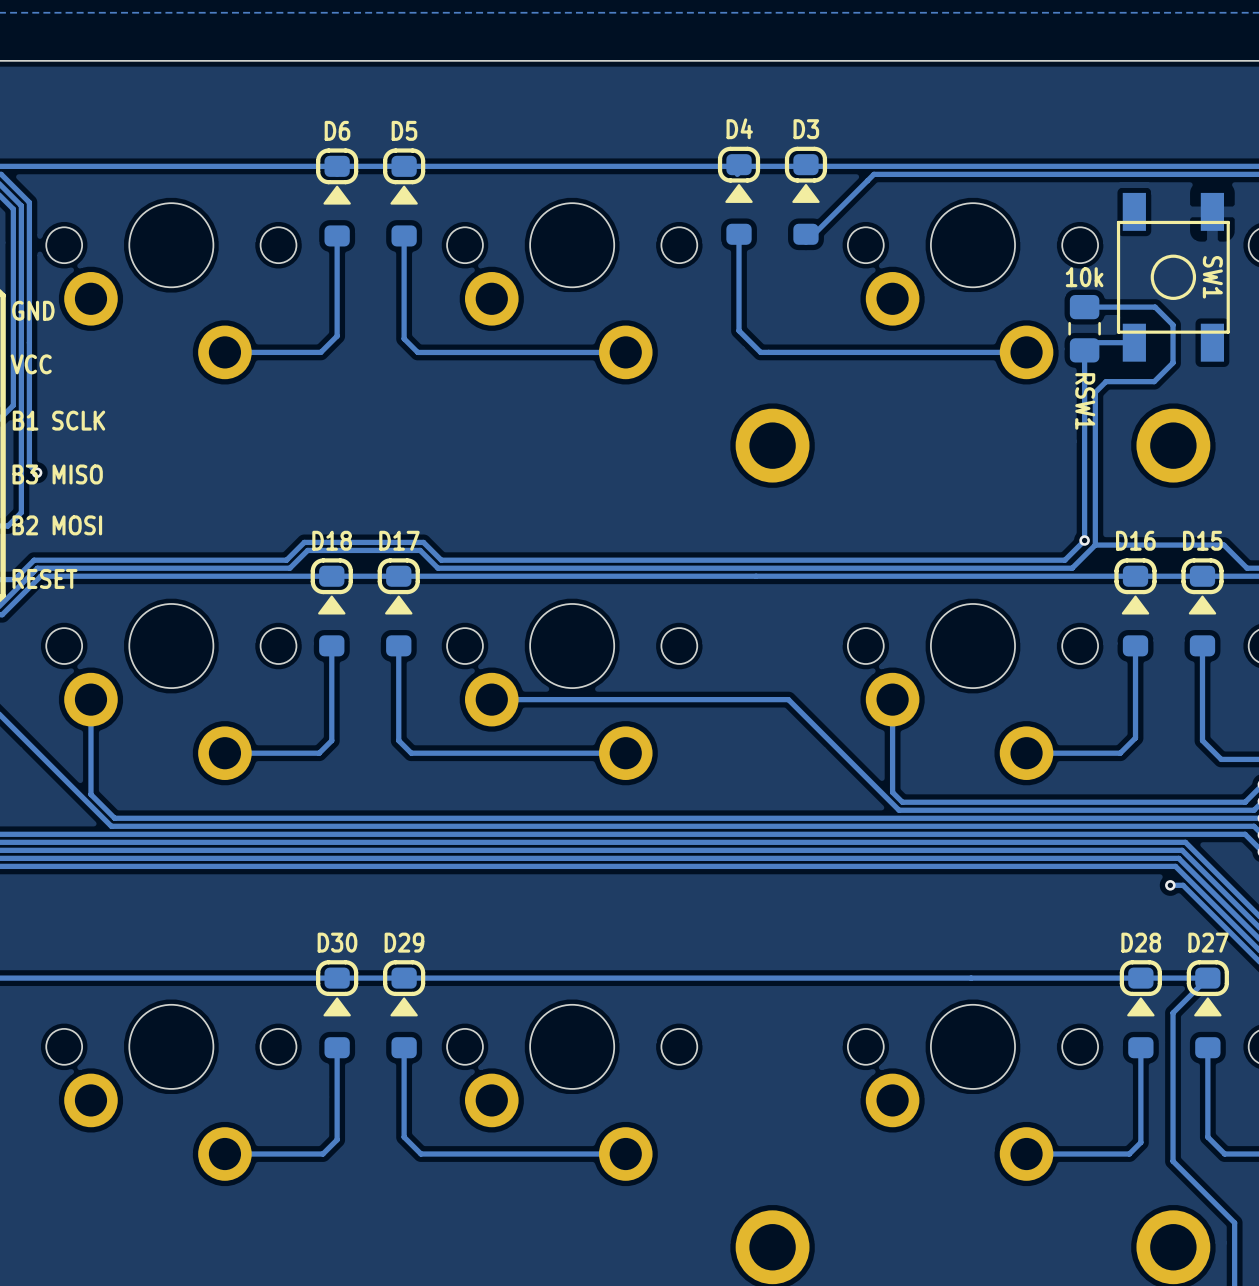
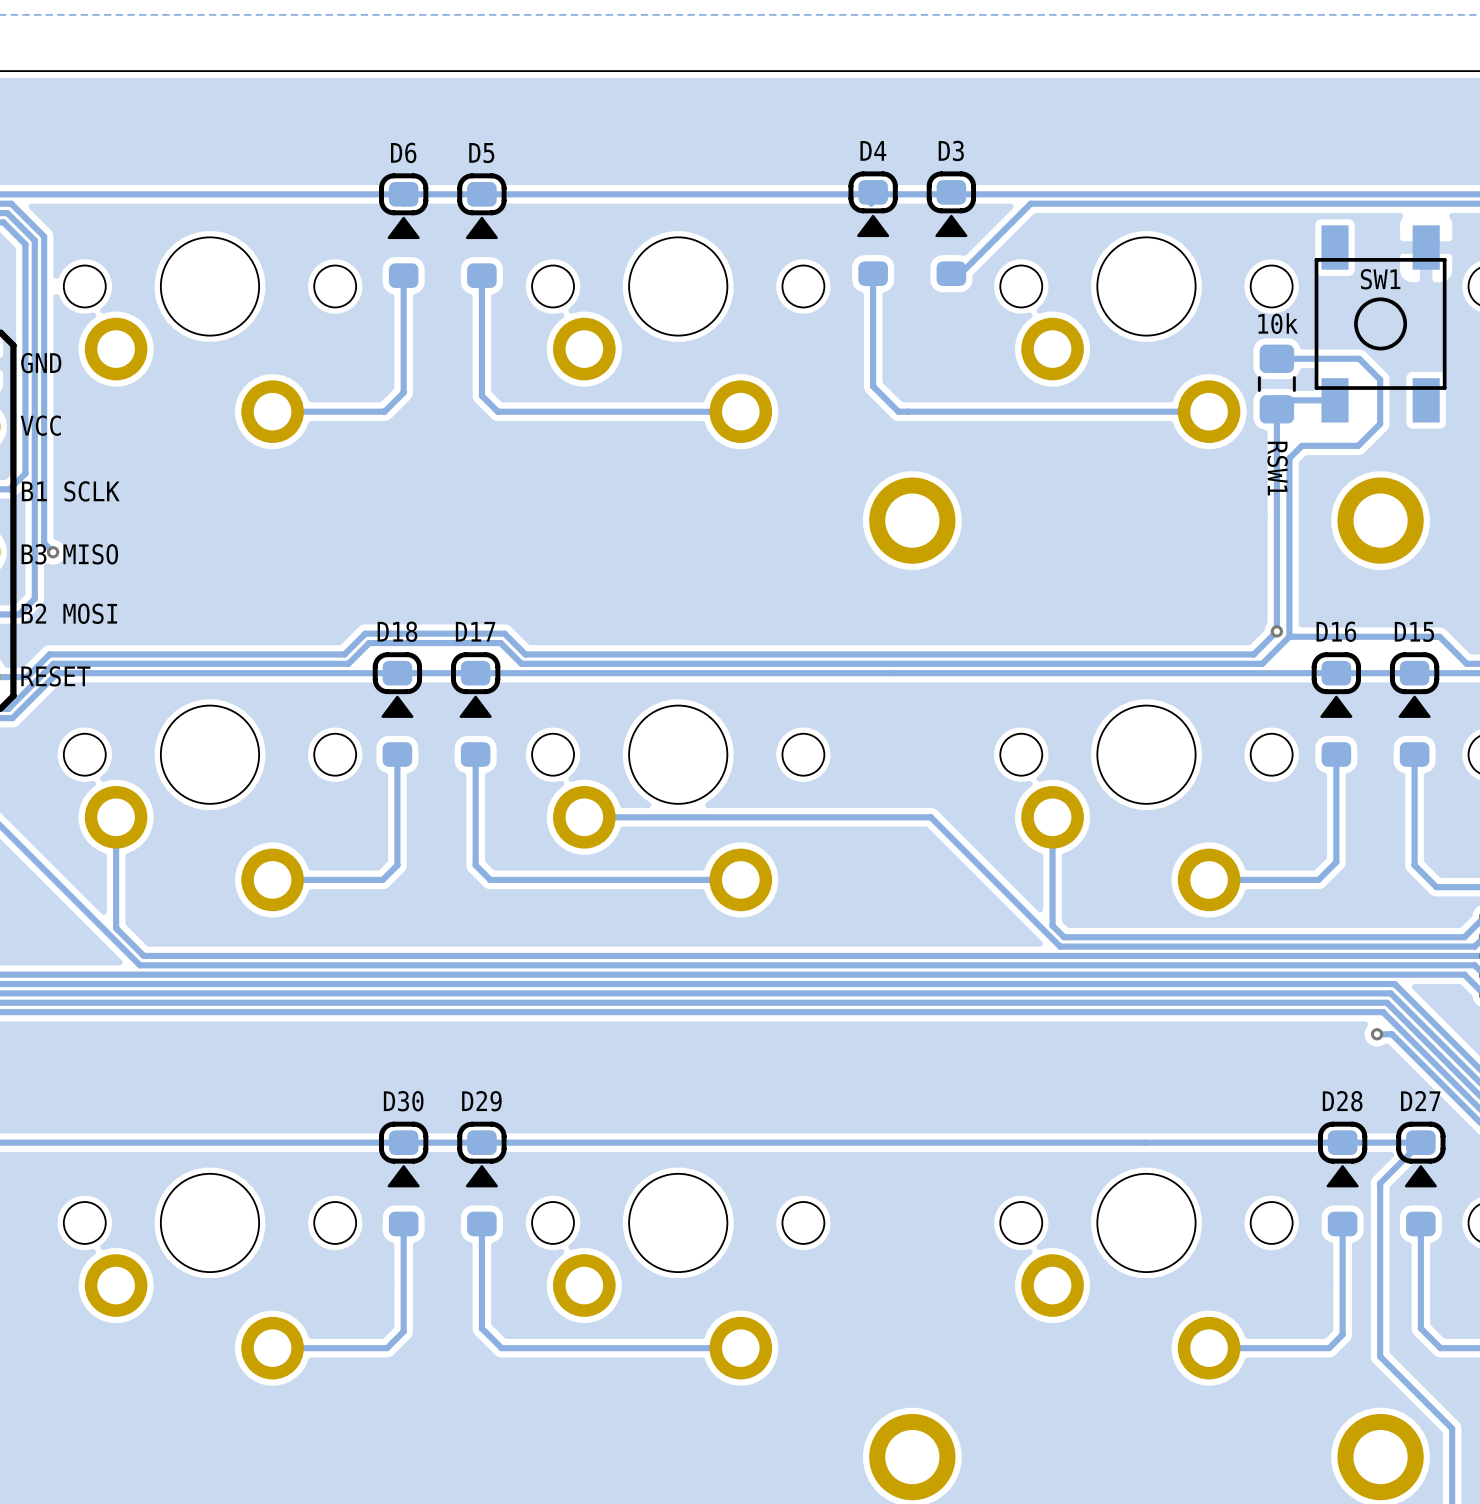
SW1 name rotation: 0° (1212, 277) -> 90° counterclockwise (1380, 279)

